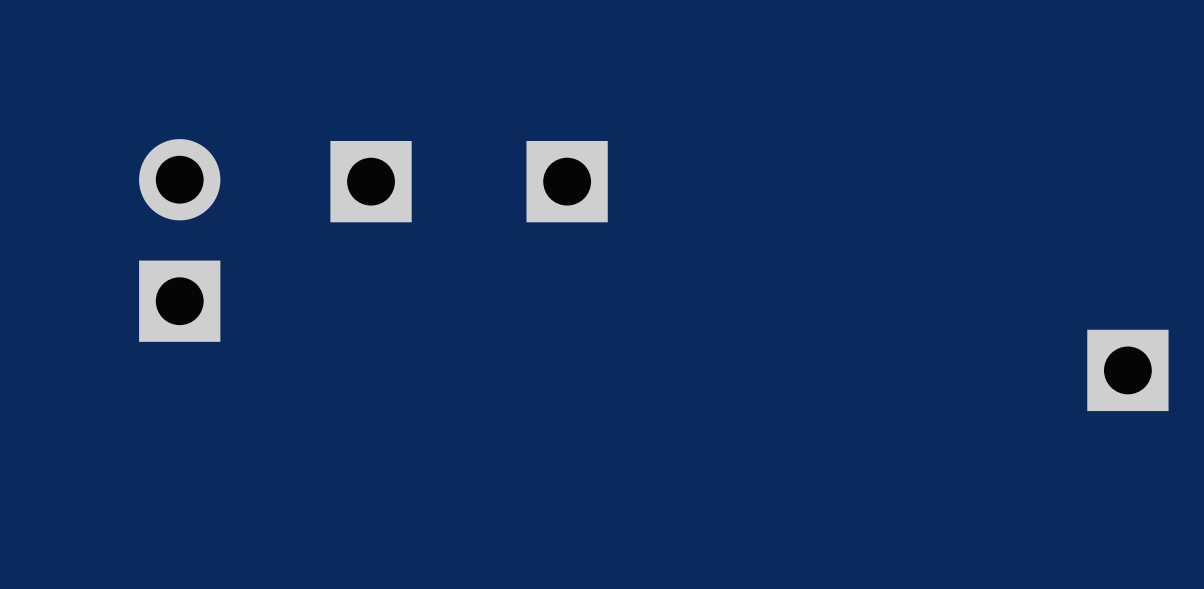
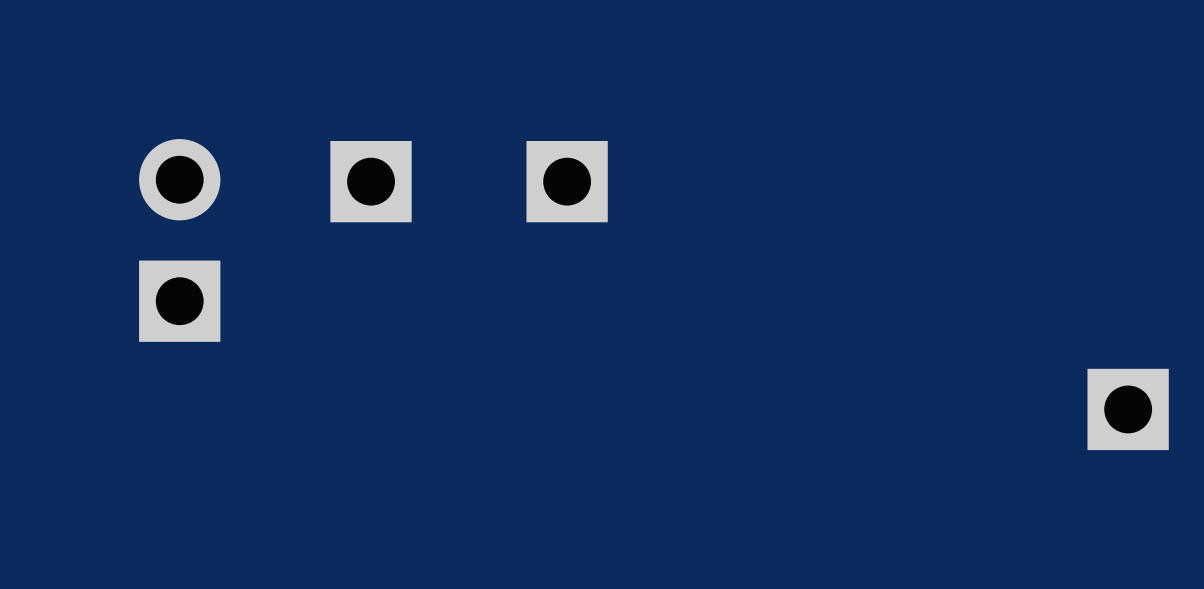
part position: (1127, 370) -> (1128, 409)

